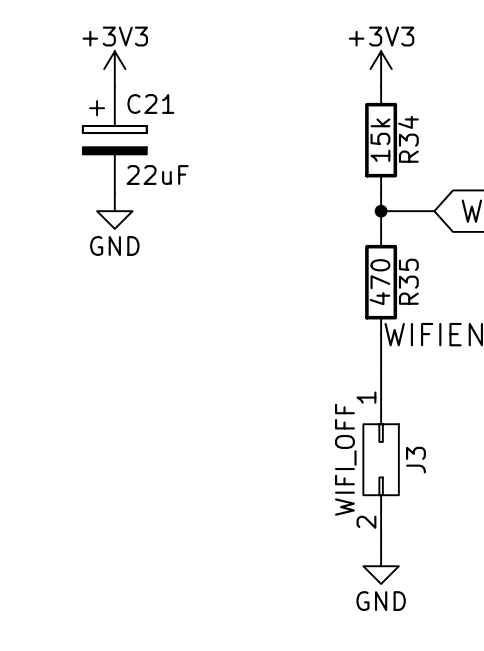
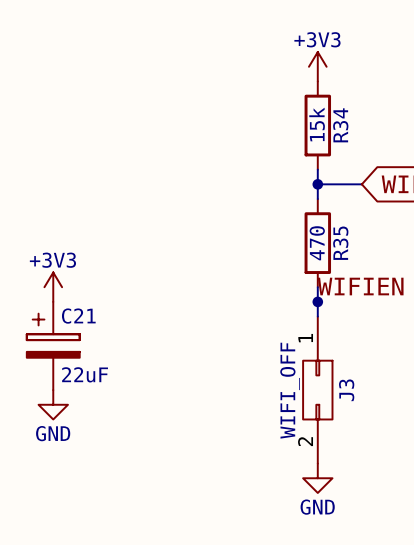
power symbol: +3V3 (114, 69) -> none
C21 position: (114, 140) -> (53, 345)
power symbol: GND (114, 211) -> none
power symbol: none -> +3V3 (53, 287)
junction: none -> (317, 301)
power symbol: none -> GND (53, 404)

